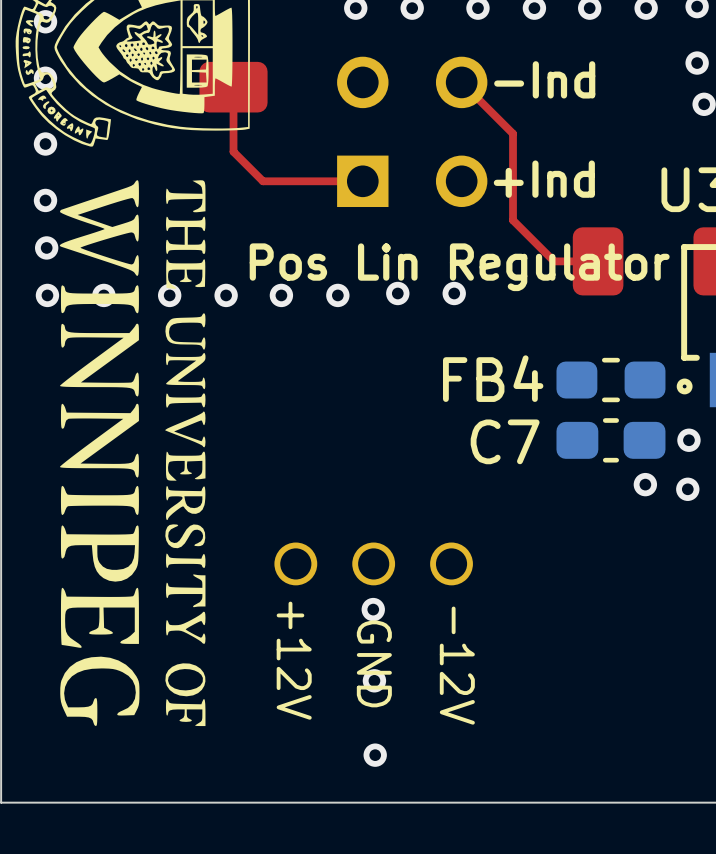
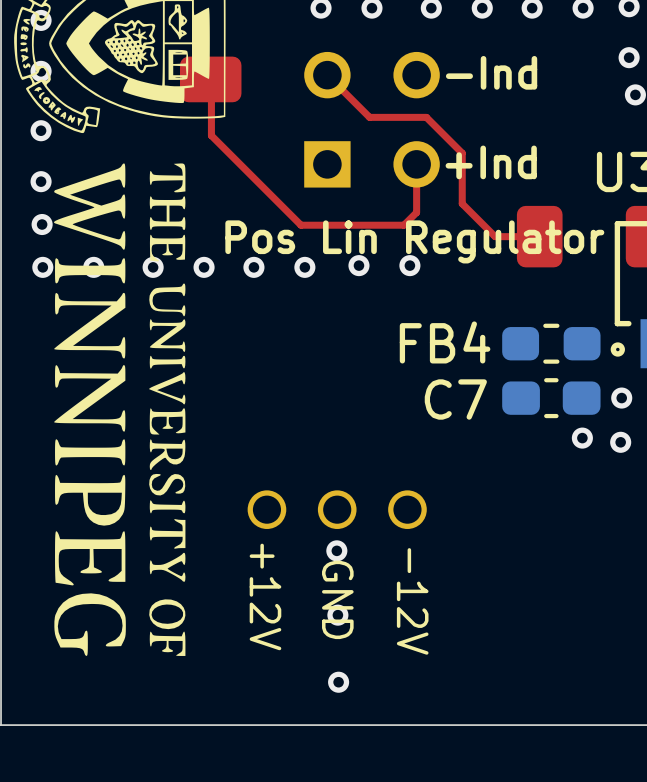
top track: none -> (211, 62) (211, 135) (301, 225) (403, 225) (416, 212) (416, 164)
top track: (461, 82) (513, 133) (513, 220) (554, 261) -> (327, 75) (369, 117) (426, 117) (462, 153) (462, 203) (495, 236) (500, 236)
top track: (233, 87) (233, 151) (263, 181) (362, 181) -> none

